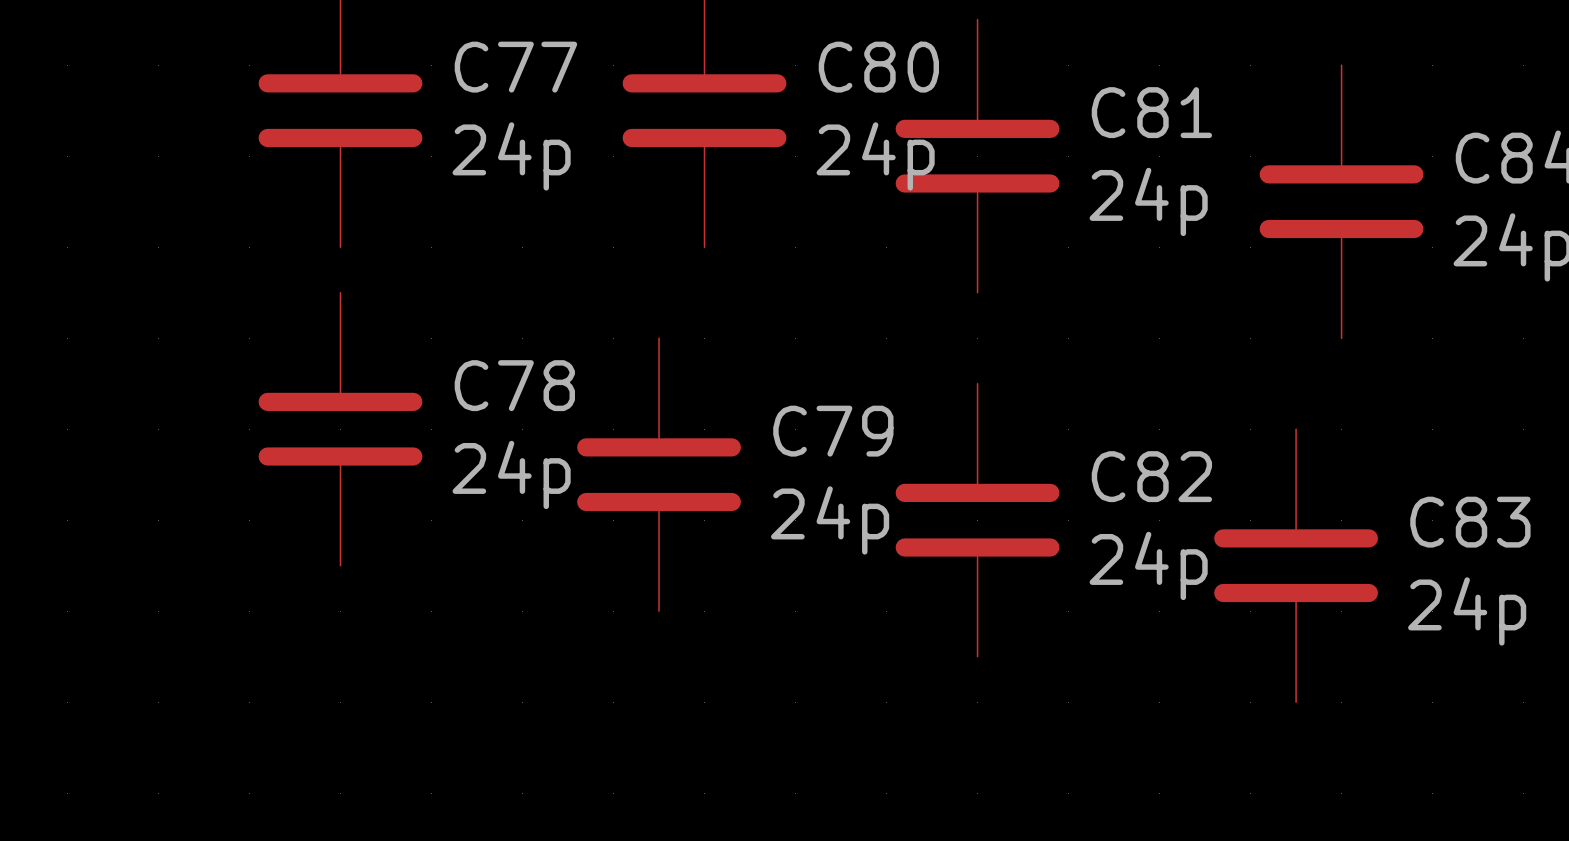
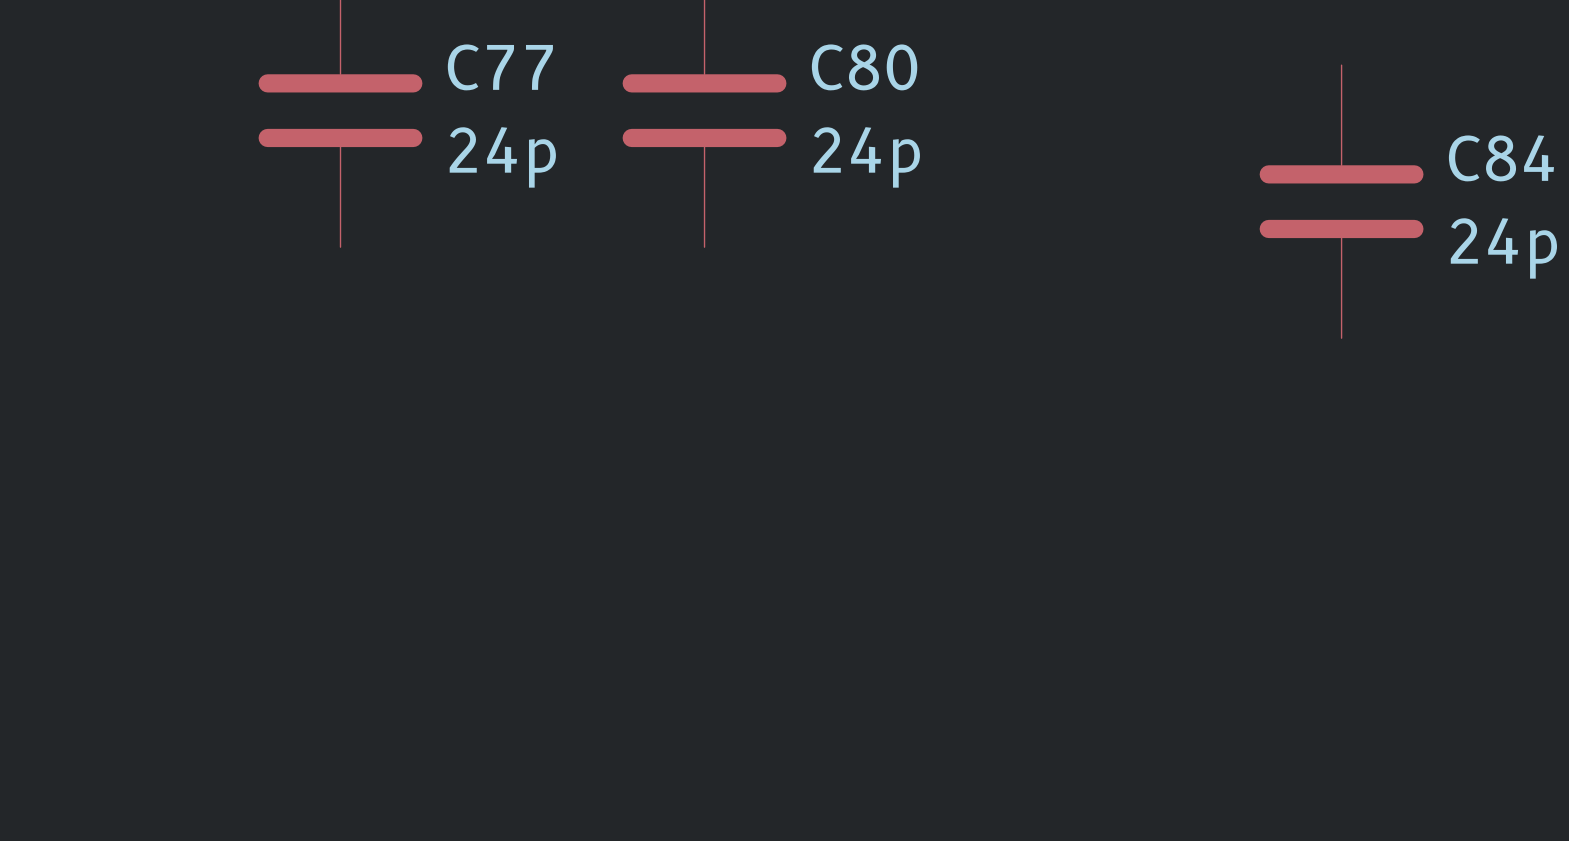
C81: 24p (977, 156) -> none
C78: 24p (340, 429) -> none
C79: 24p (659, 474) -> none
C82: 24p (977, 520) -> none
C83: 24p (1296, 565) -> none

